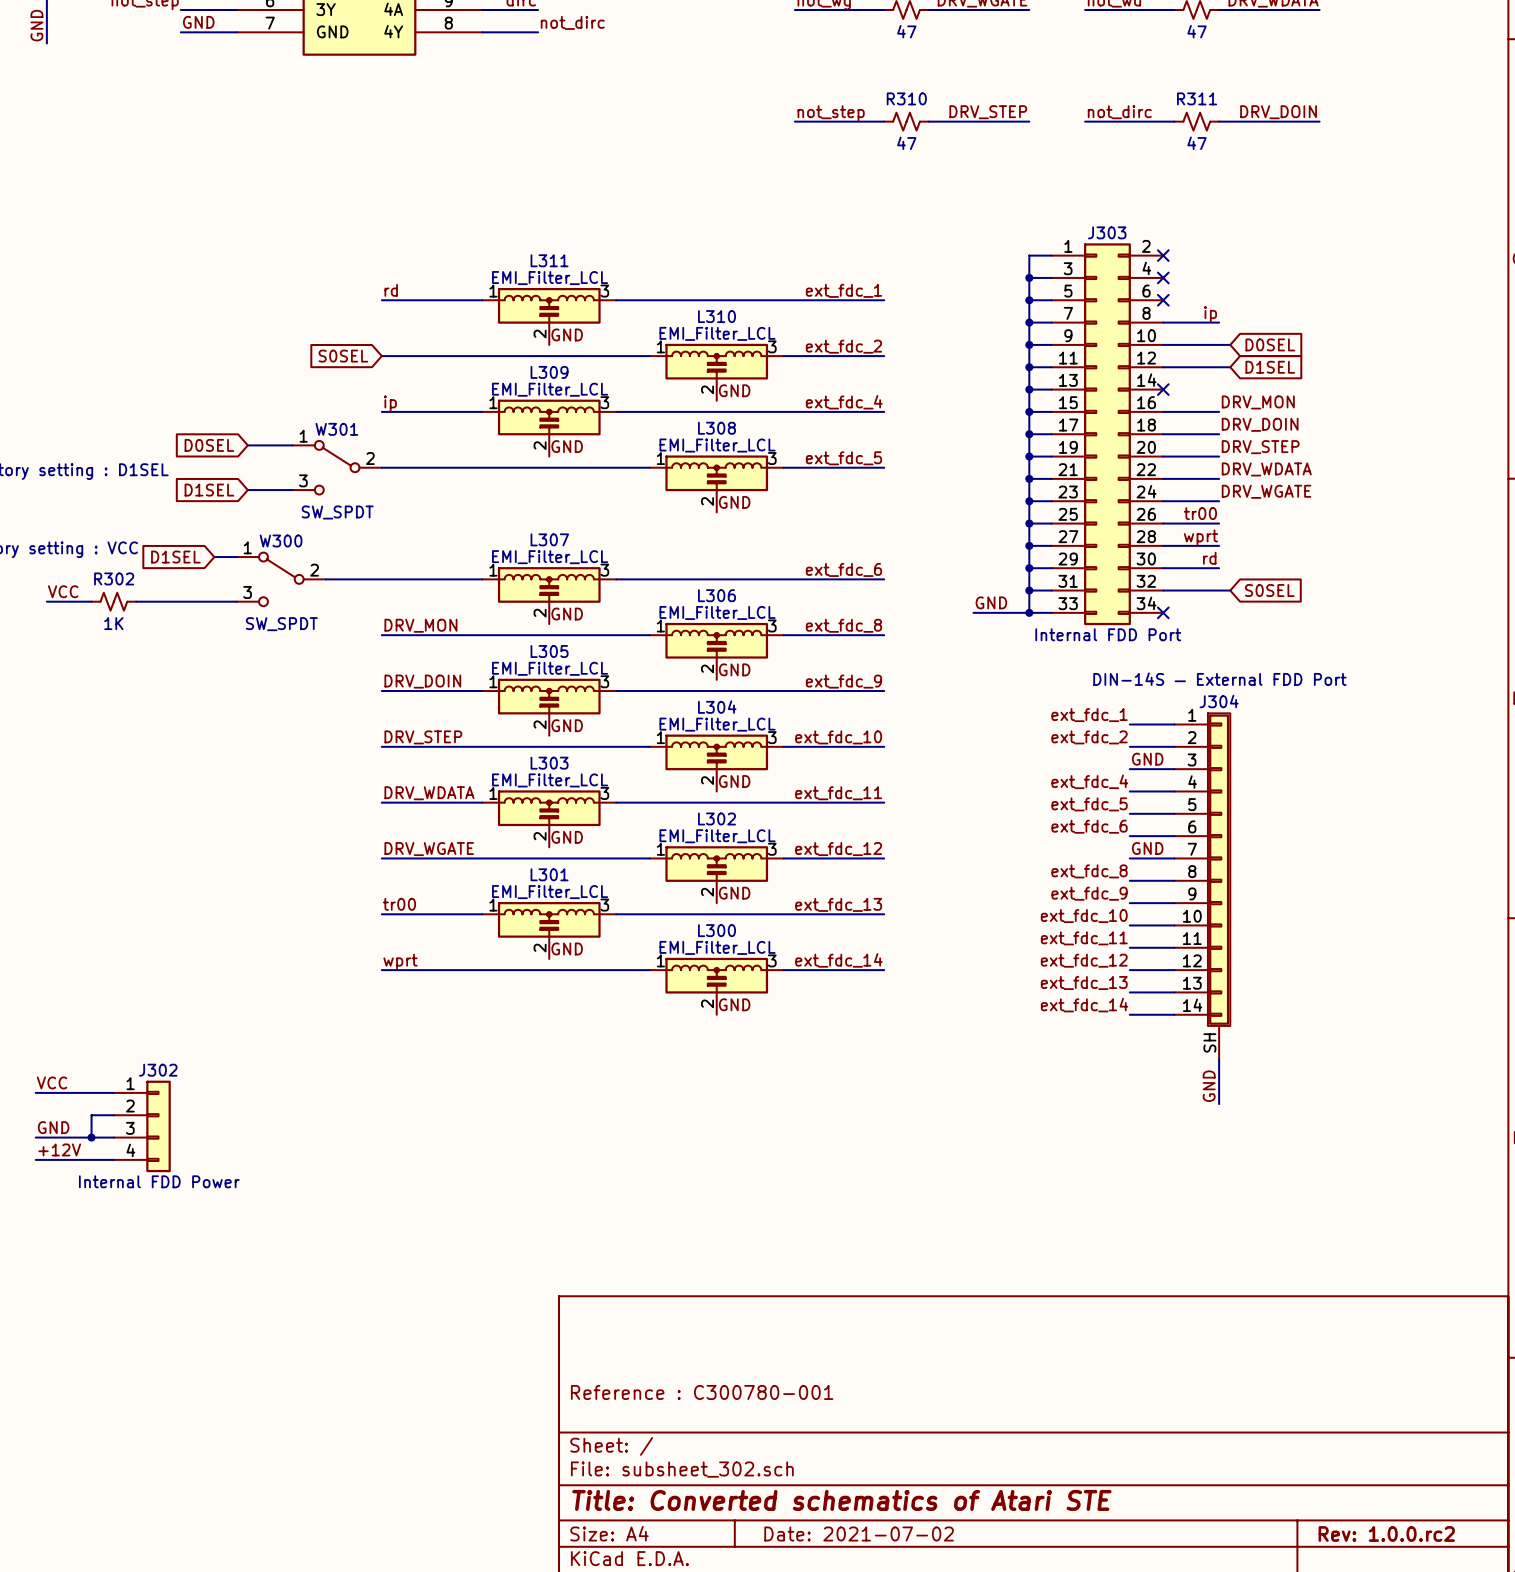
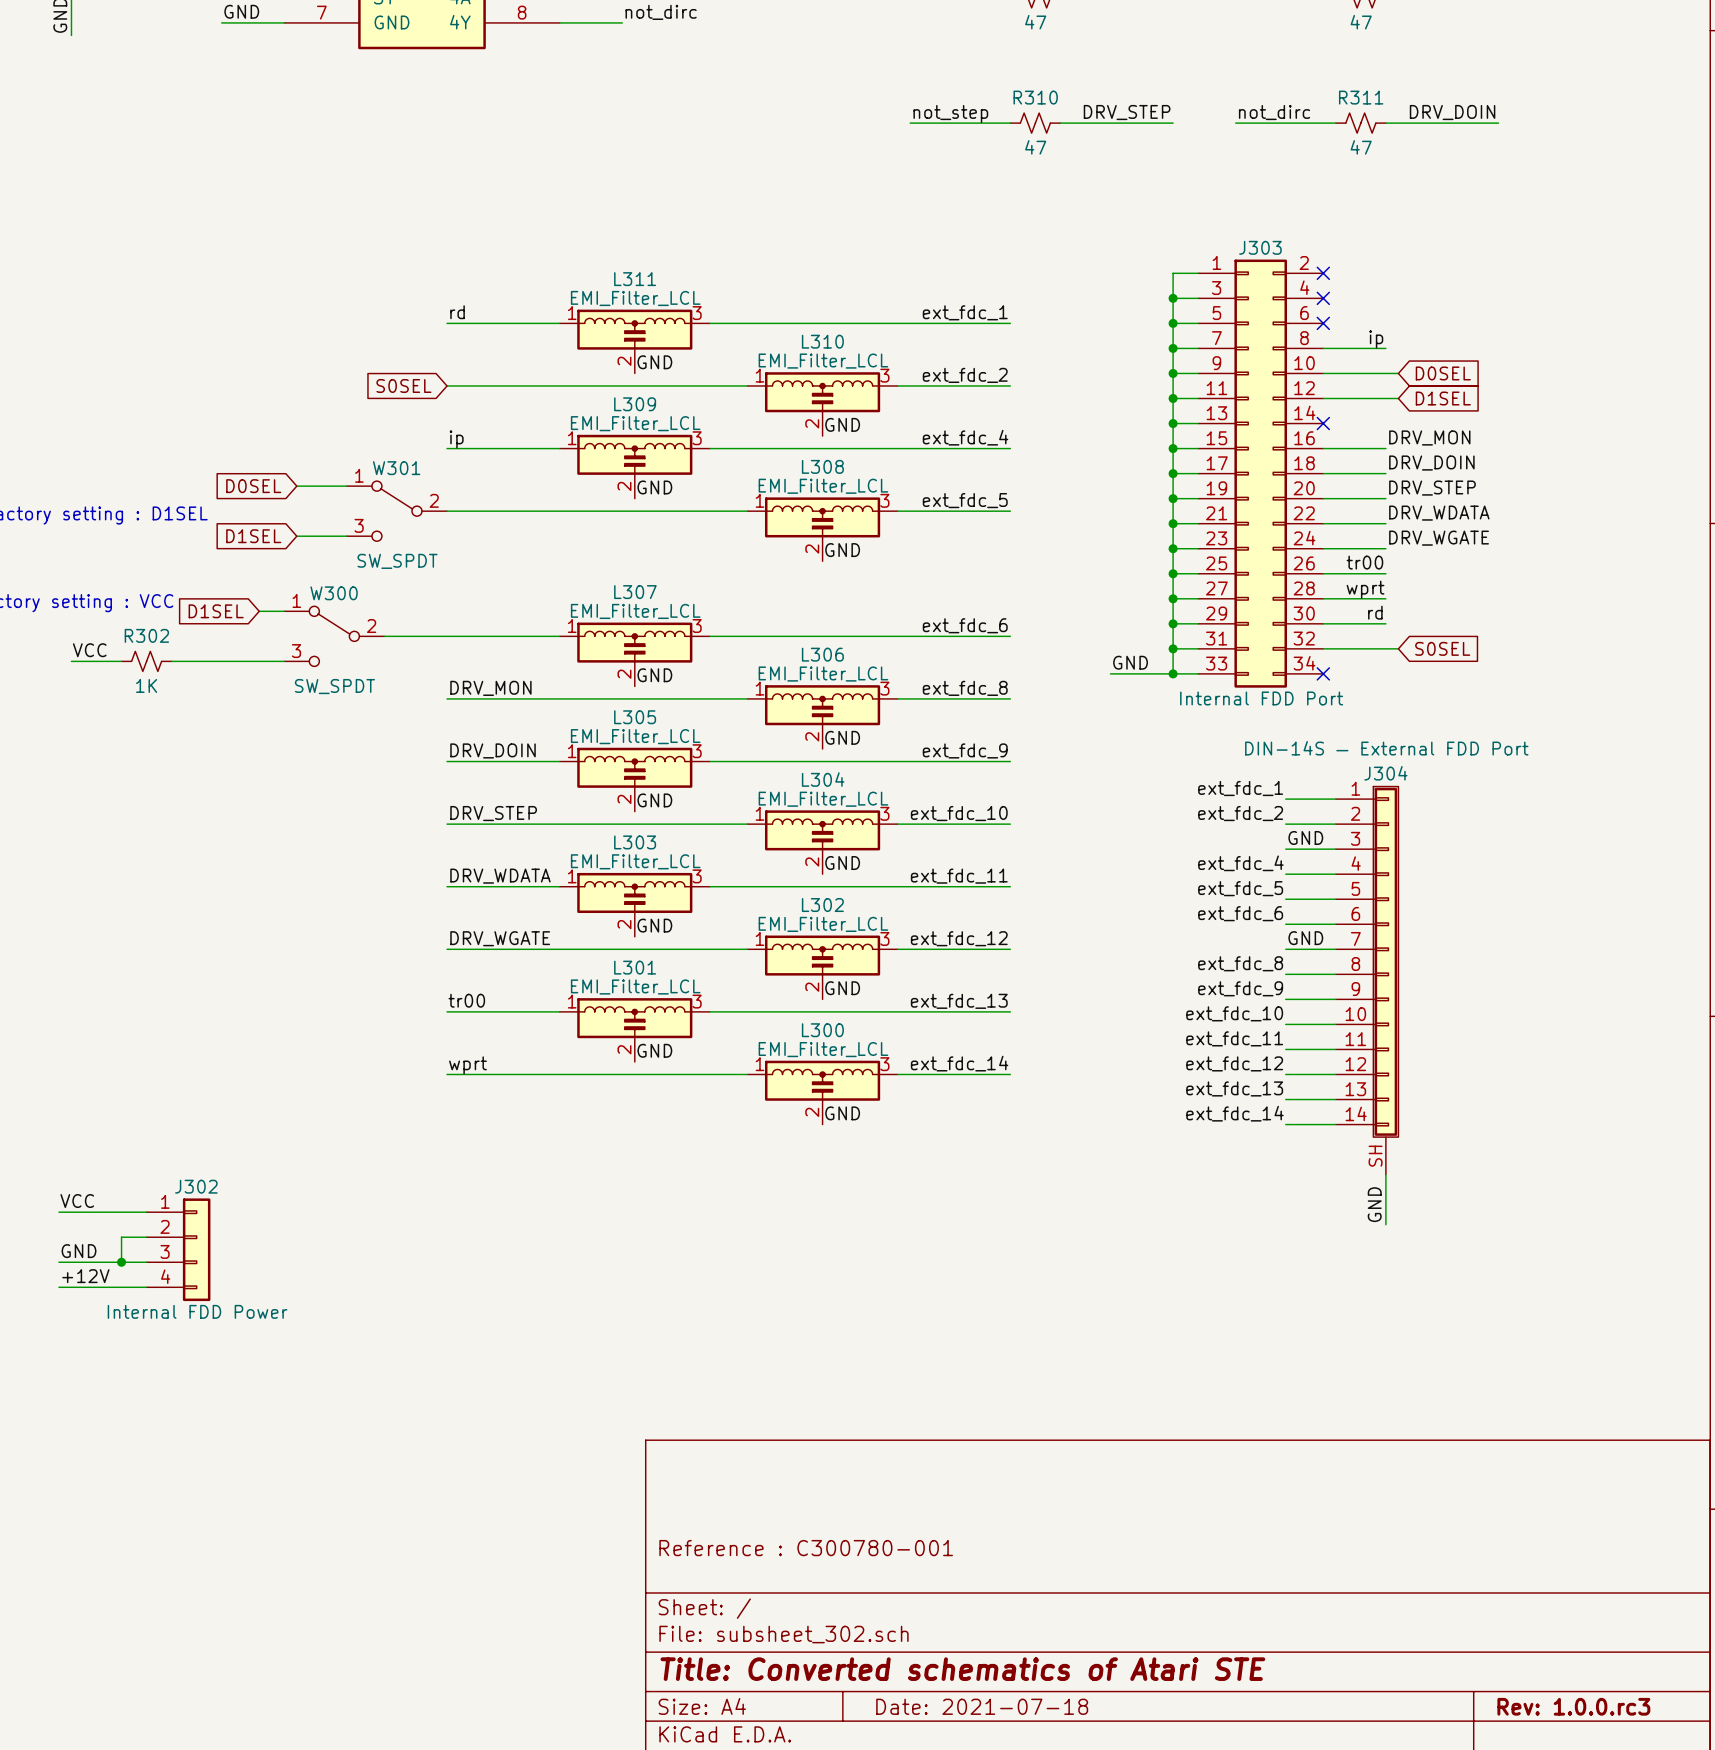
title block: Date: 2021-07-02 (859, 1534) -> Date: 2021-07-18 (982, 1706)
title block: Rev: 1.0.0.rc2 (1386, 1534) -> Rev: 1.0.0.rc3 (1573, 1706)

